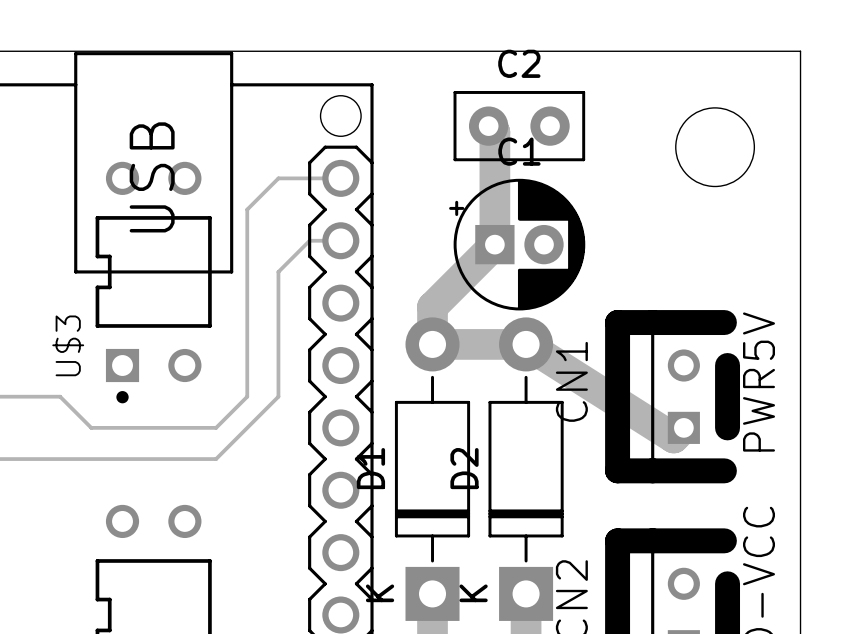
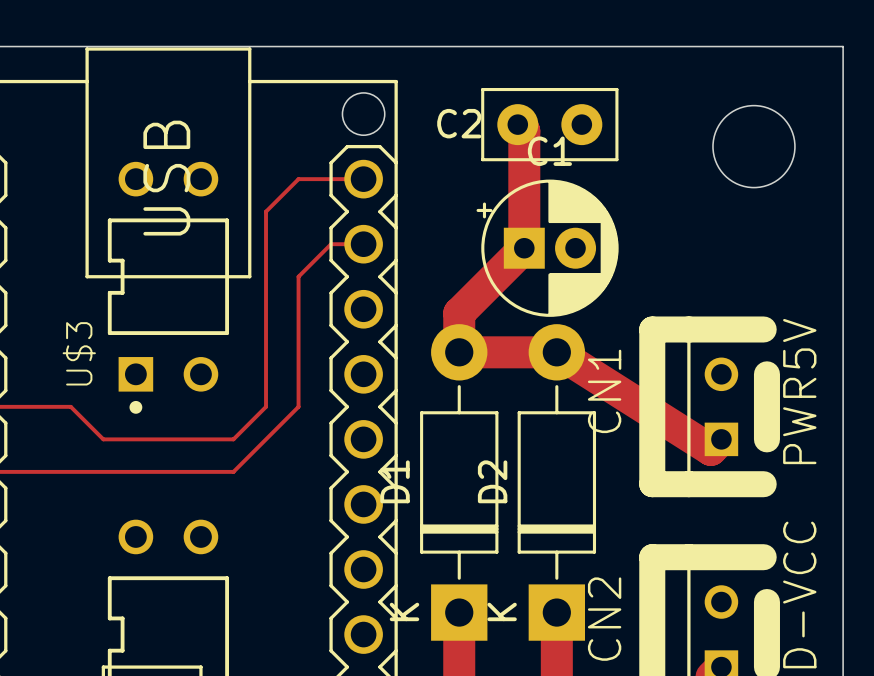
C2 name position: C2 (519, 63) -> C2 (459, 123)

